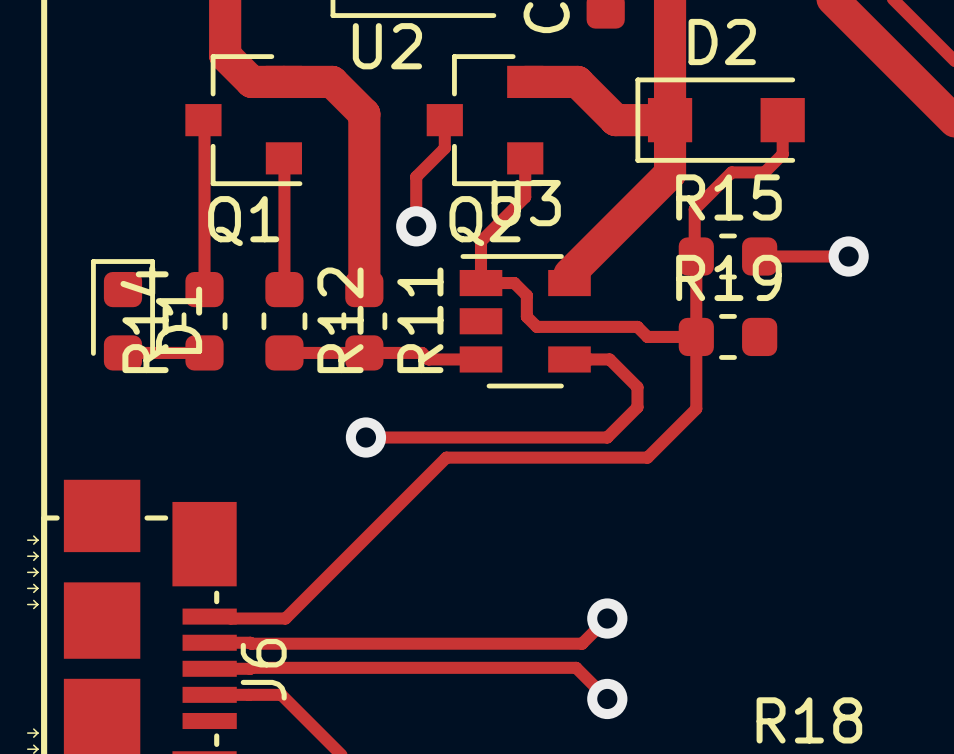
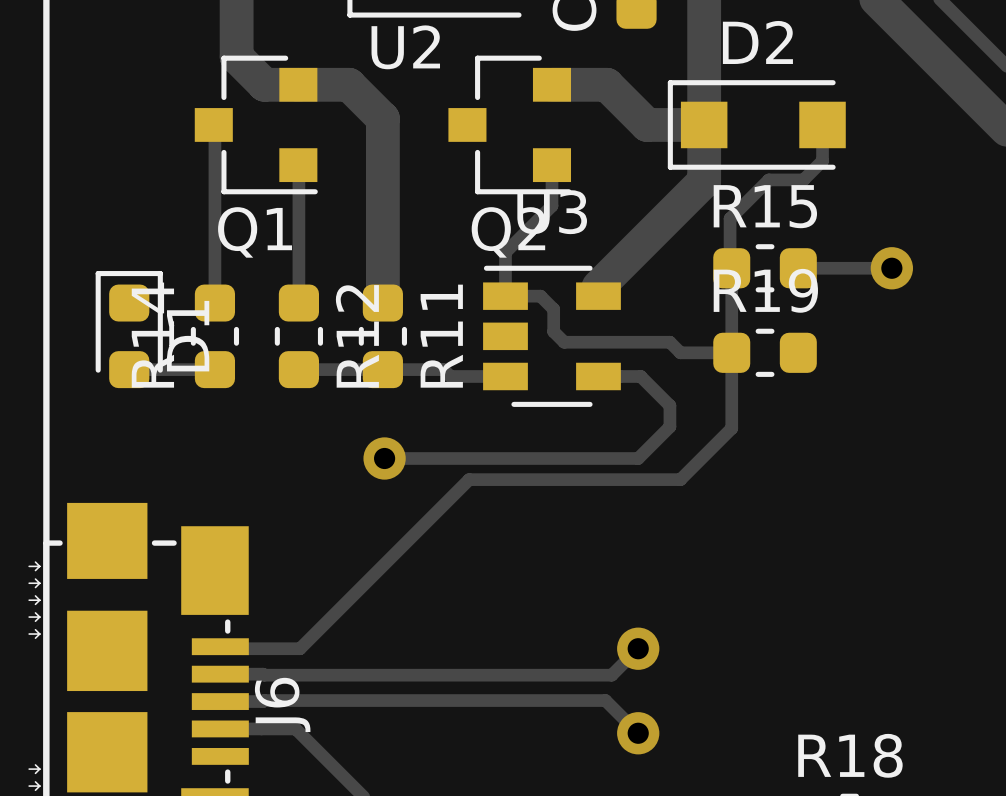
track: (444, 120) (444, 148) (416, 176) (416, 226) -> none
via: (416, 226) -> none

